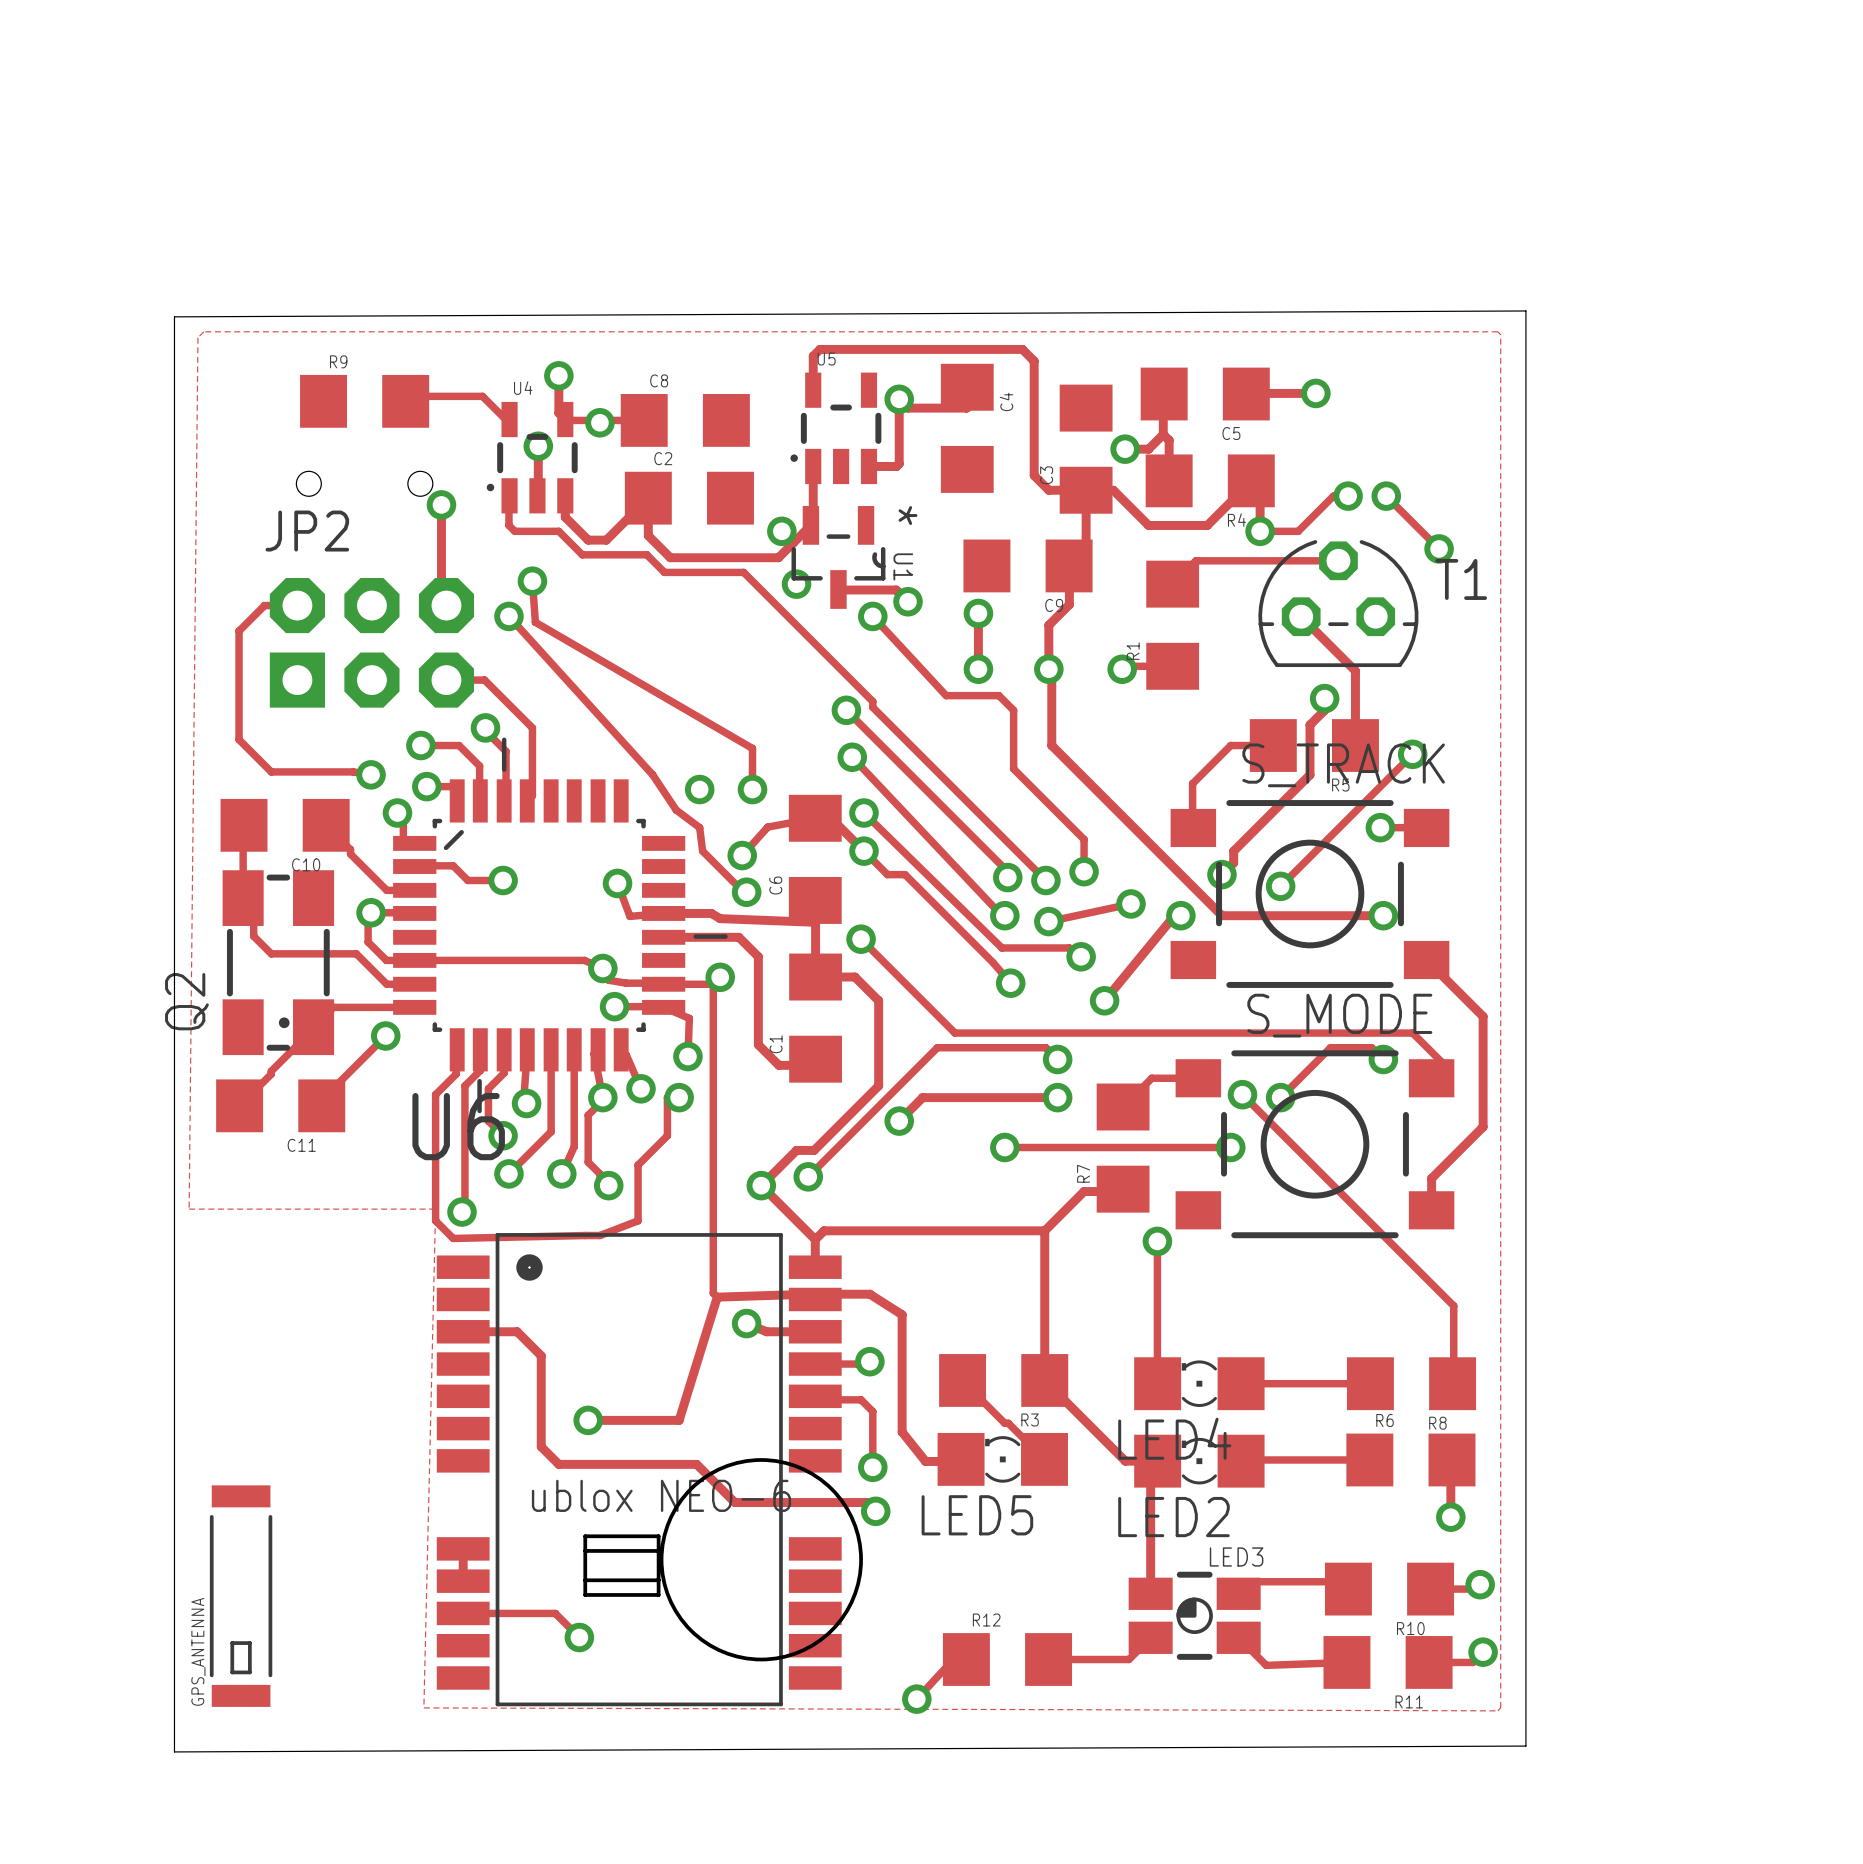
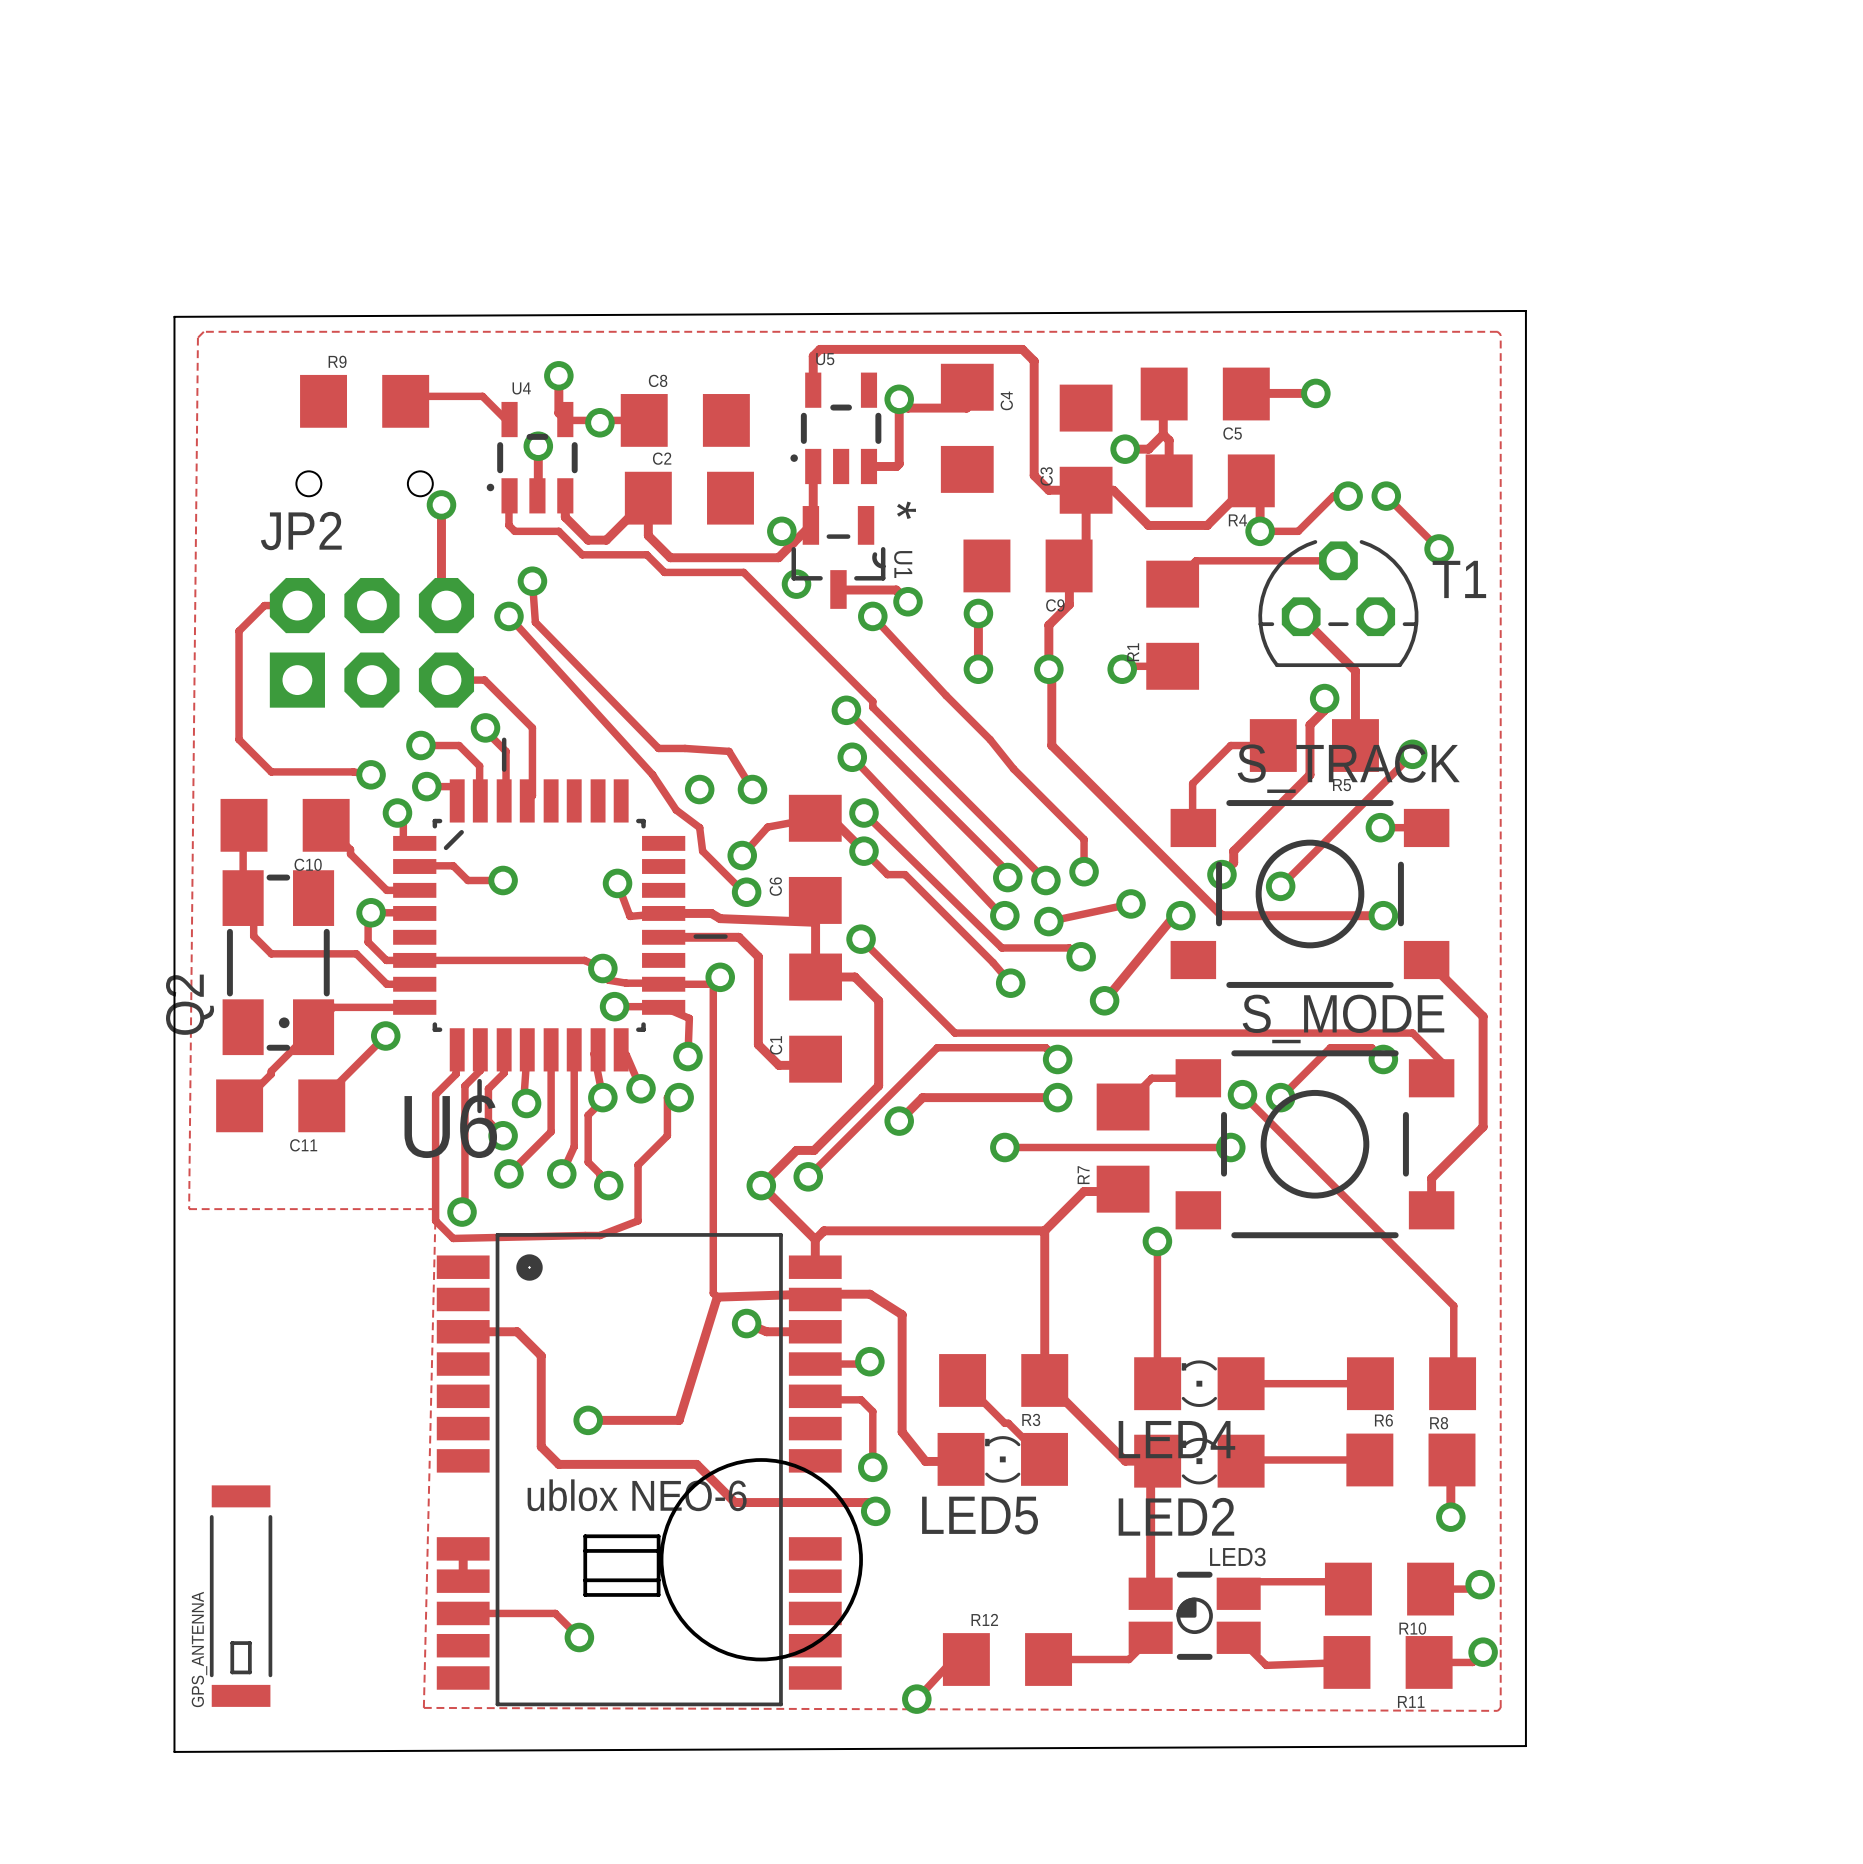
track: (535, 622) (752, 748) (752, 789) -> (535, 622) (658, 748) (729, 751) (752, 789)
track: (946, 695) (998, 695) (1013, 710) (1013, 768) -> (946, 695) (990, 739) (1013, 768)

